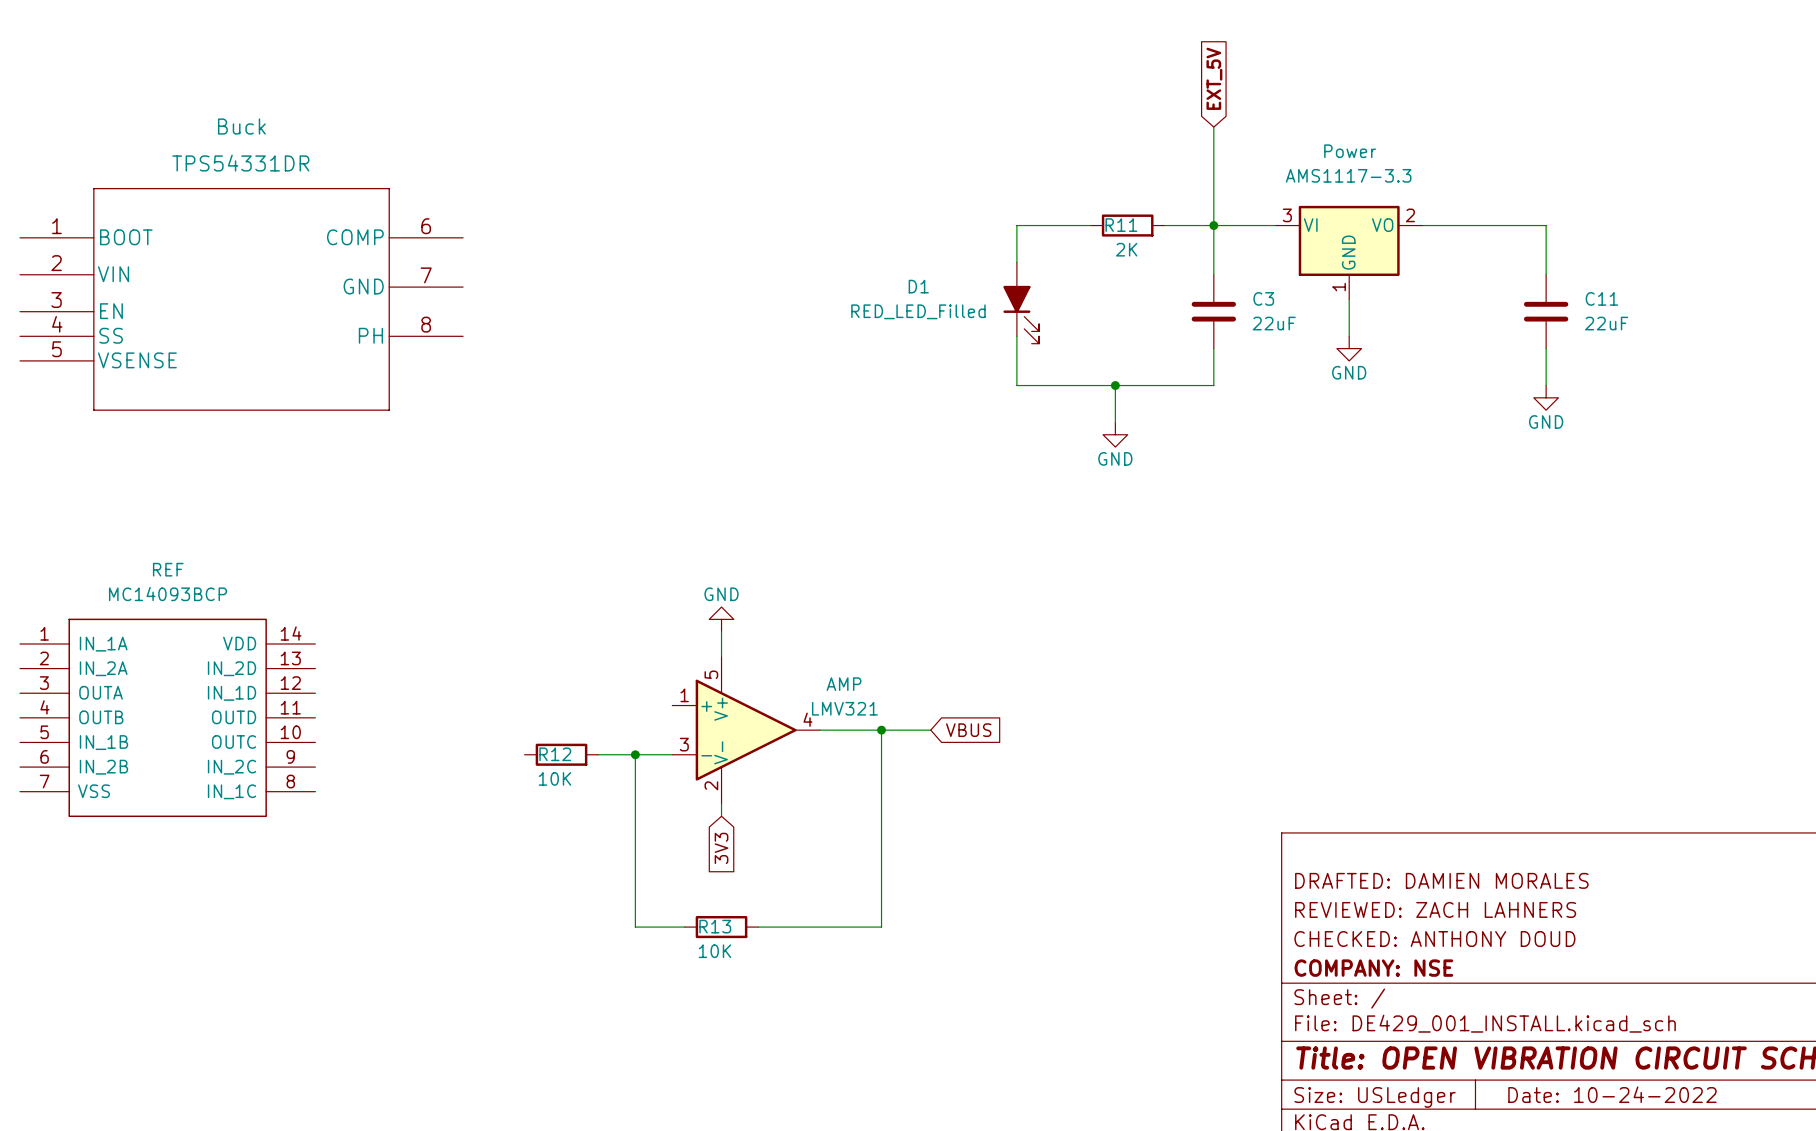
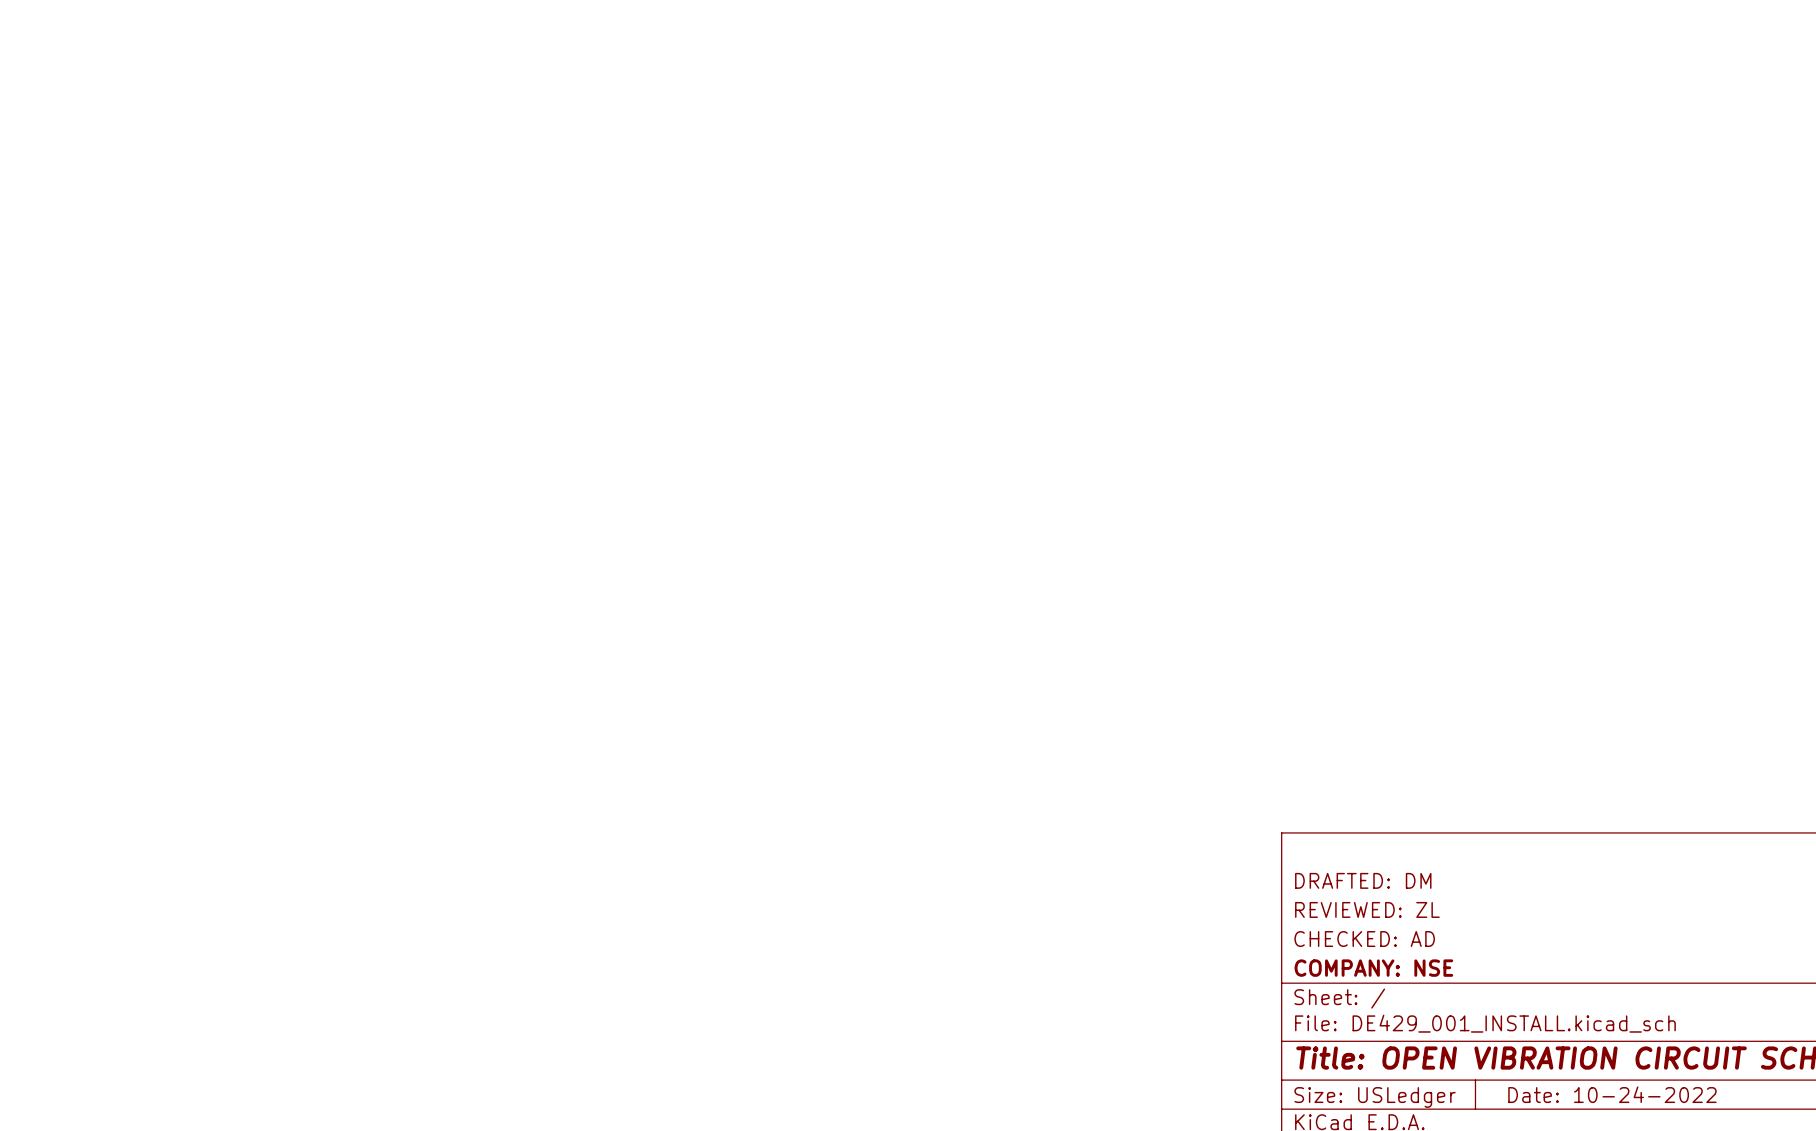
global label: EXT_5V (1214, 78) -> none
wire: (1213, 127) (1213, 274) -> none
wire: (1090, 225) (1016, 225) (1016, 262) -> none
R11: 2K (1127, 225) -> none
wire: (1164, 225) (1275, 225) -> none
junction: (1213, 225) -> none
wire: (1423, 225) (1546, 225) (1546, 274) -> none
Power: AMS1117-3.3 (1349, 252) -> none
Buck: TPS54331DR (241, 299) -> none
wire: (1349, 299) (1349, 336) -> none
D1: RED_LED_Filled (1021, 303) -> none
C3: 22uF (1213, 311) -> none
C11: 22uF (1546, 311) -> none
wire: (1016, 336) (1016, 385) (1213, 385) (1213, 348) -> none
power symbol: GND (1349, 348) -> none
wire: (1546, 348) (1546, 385) -> none
wire: (1115, 385) (1115, 422) -> none
junction: (1115, 385) -> none
power symbol: GND (1546, 397) -> none
power symbol: GND (1115, 434) -> none
power symbol: GND (721, 619) -> none
wire: (721, 631) (721, 656) -> none
REF: MC14093BCP (167, 717) -> none
AMP: LMV321 (746, 730) -> none
wire: (819, 730) (930, 730) -> none
wire: (881, 730) (881, 927) (758, 927) -> none
junction: (881, 730) -> none
global label: VBUS (968, 730) -> none
R12: 10K (561, 754) -> none
wire: (598, 754) (672, 754) -> none
wire: (635, 754) (635, 927) (684, 927) -> none
junction: (635, 754) -> none
wire: (721, 803) (721, 816) -> none
global label: 3V3 (721, 848) -> none
title block: DRAFTED: DAMIEN MORALES (1441, 880) -> DRAFTED: DM (1363, 880)
title block: REVIEWED: ZACH LAHNERS (1435, 909) -> REVIEWED: ZL (1367, 909)
R13: 10K (721, 927) -> none
title block: CHECKED: ANTHONY DOUD (1434, 939) -> CHECKED: AD (1364, 939)

